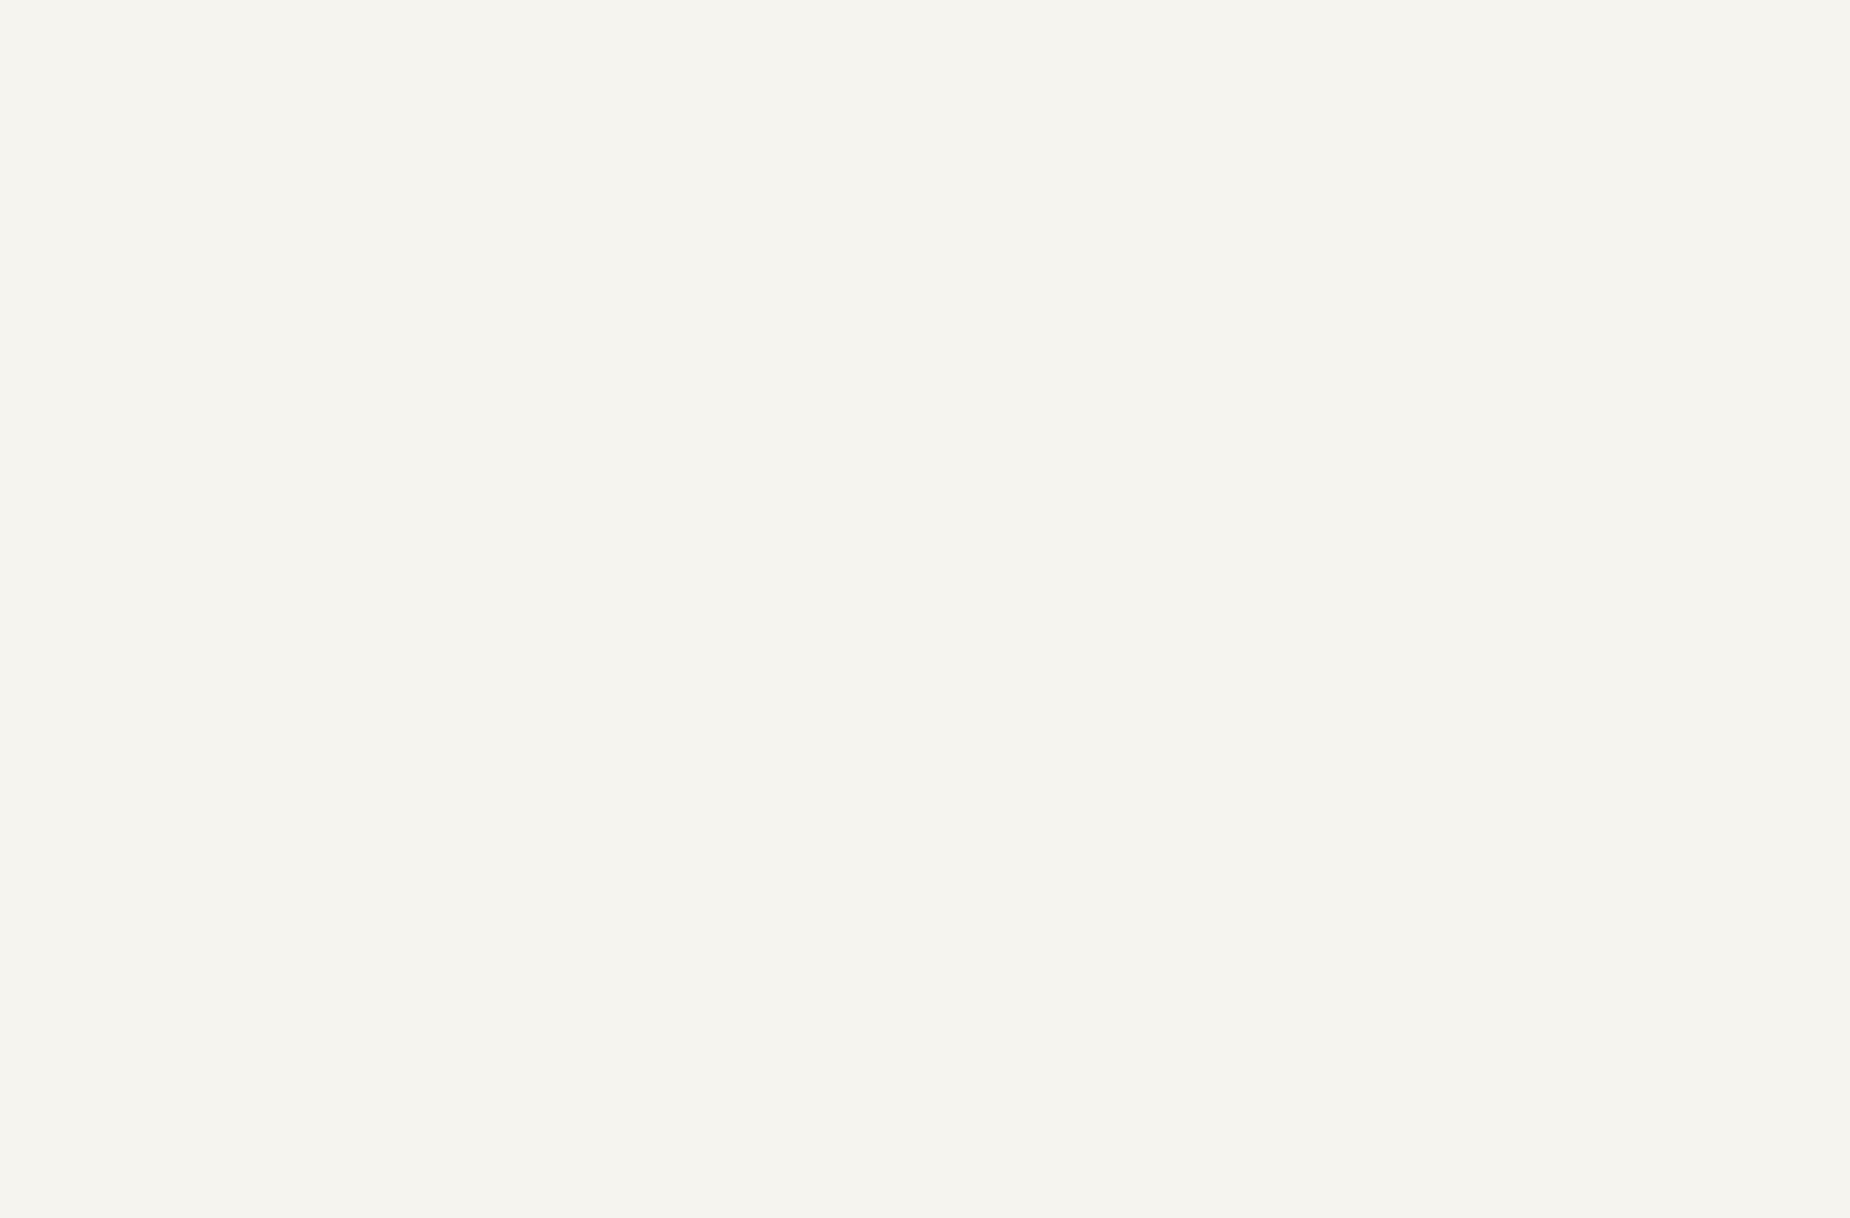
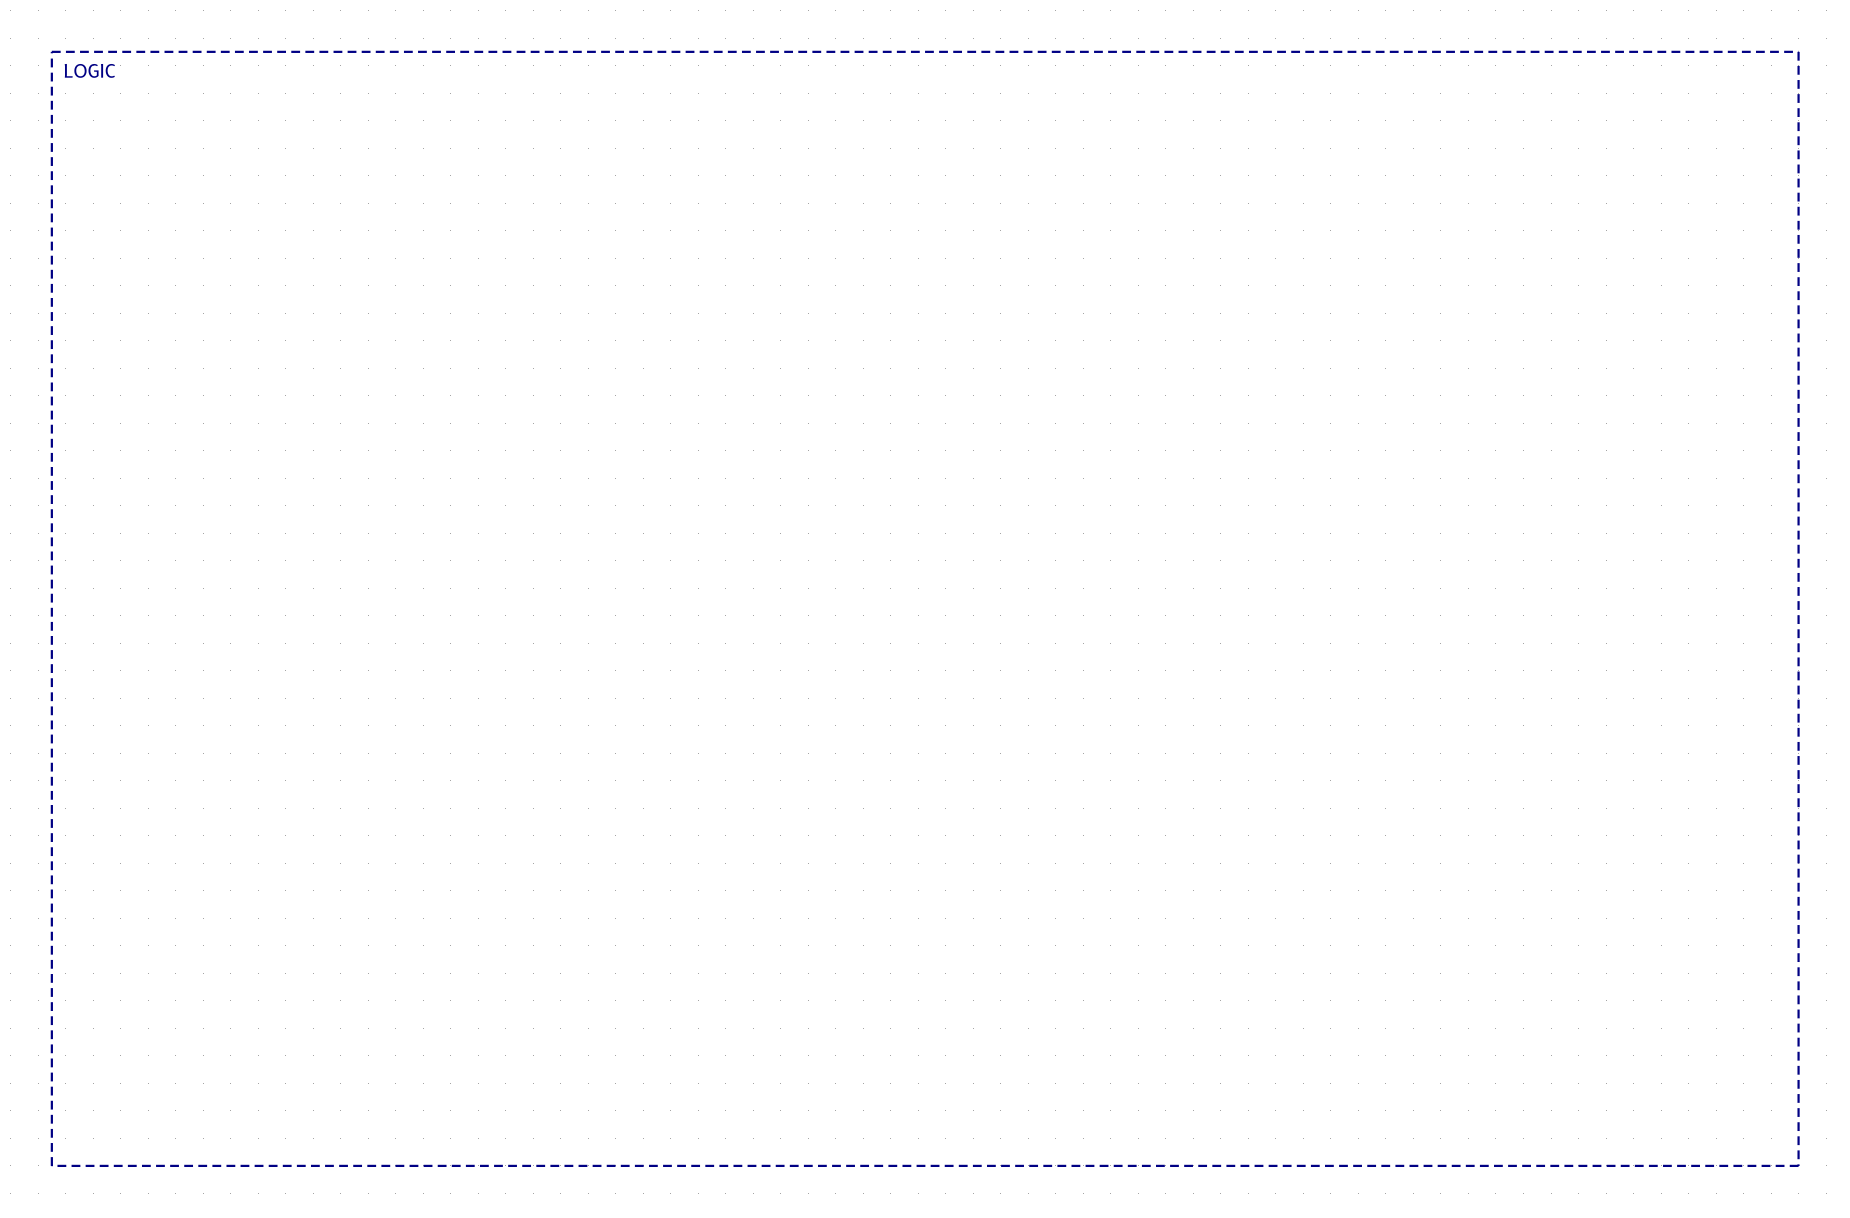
line: none -> (51, 51) (1798, 51) (1798, 1165) (51, 1165) (51, 51)
text: none -> LOGIC (89, 70)

